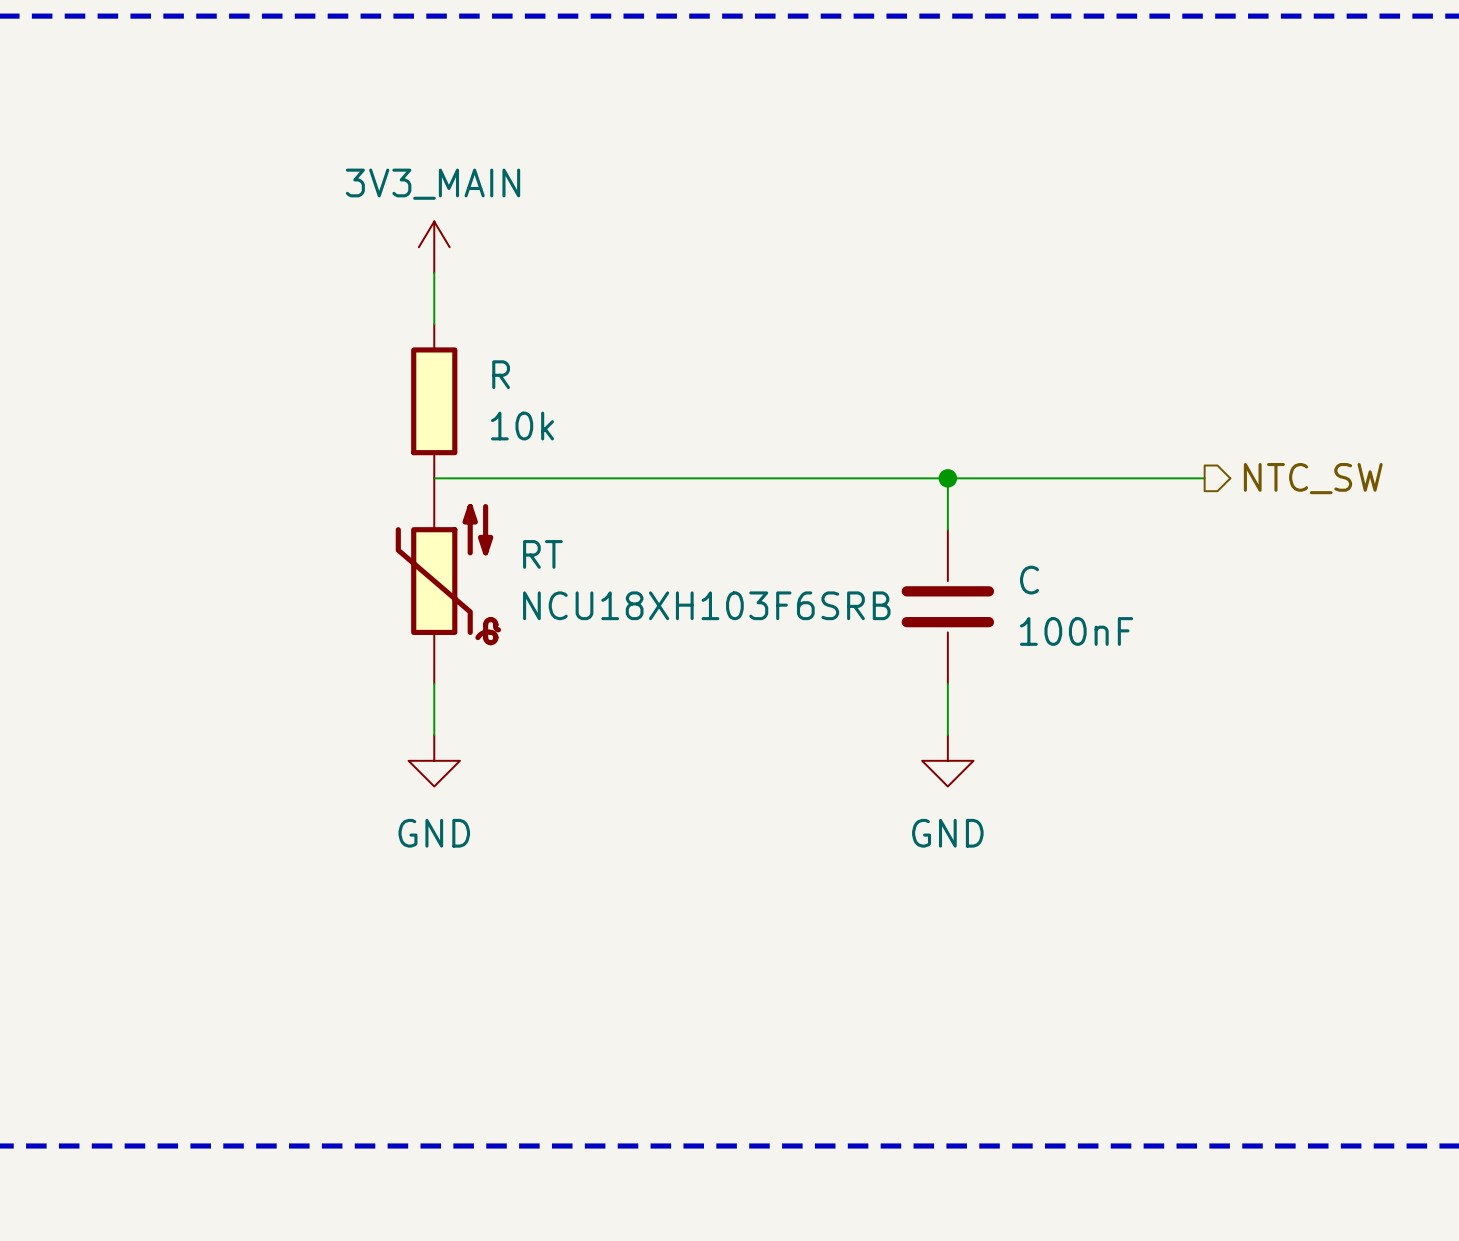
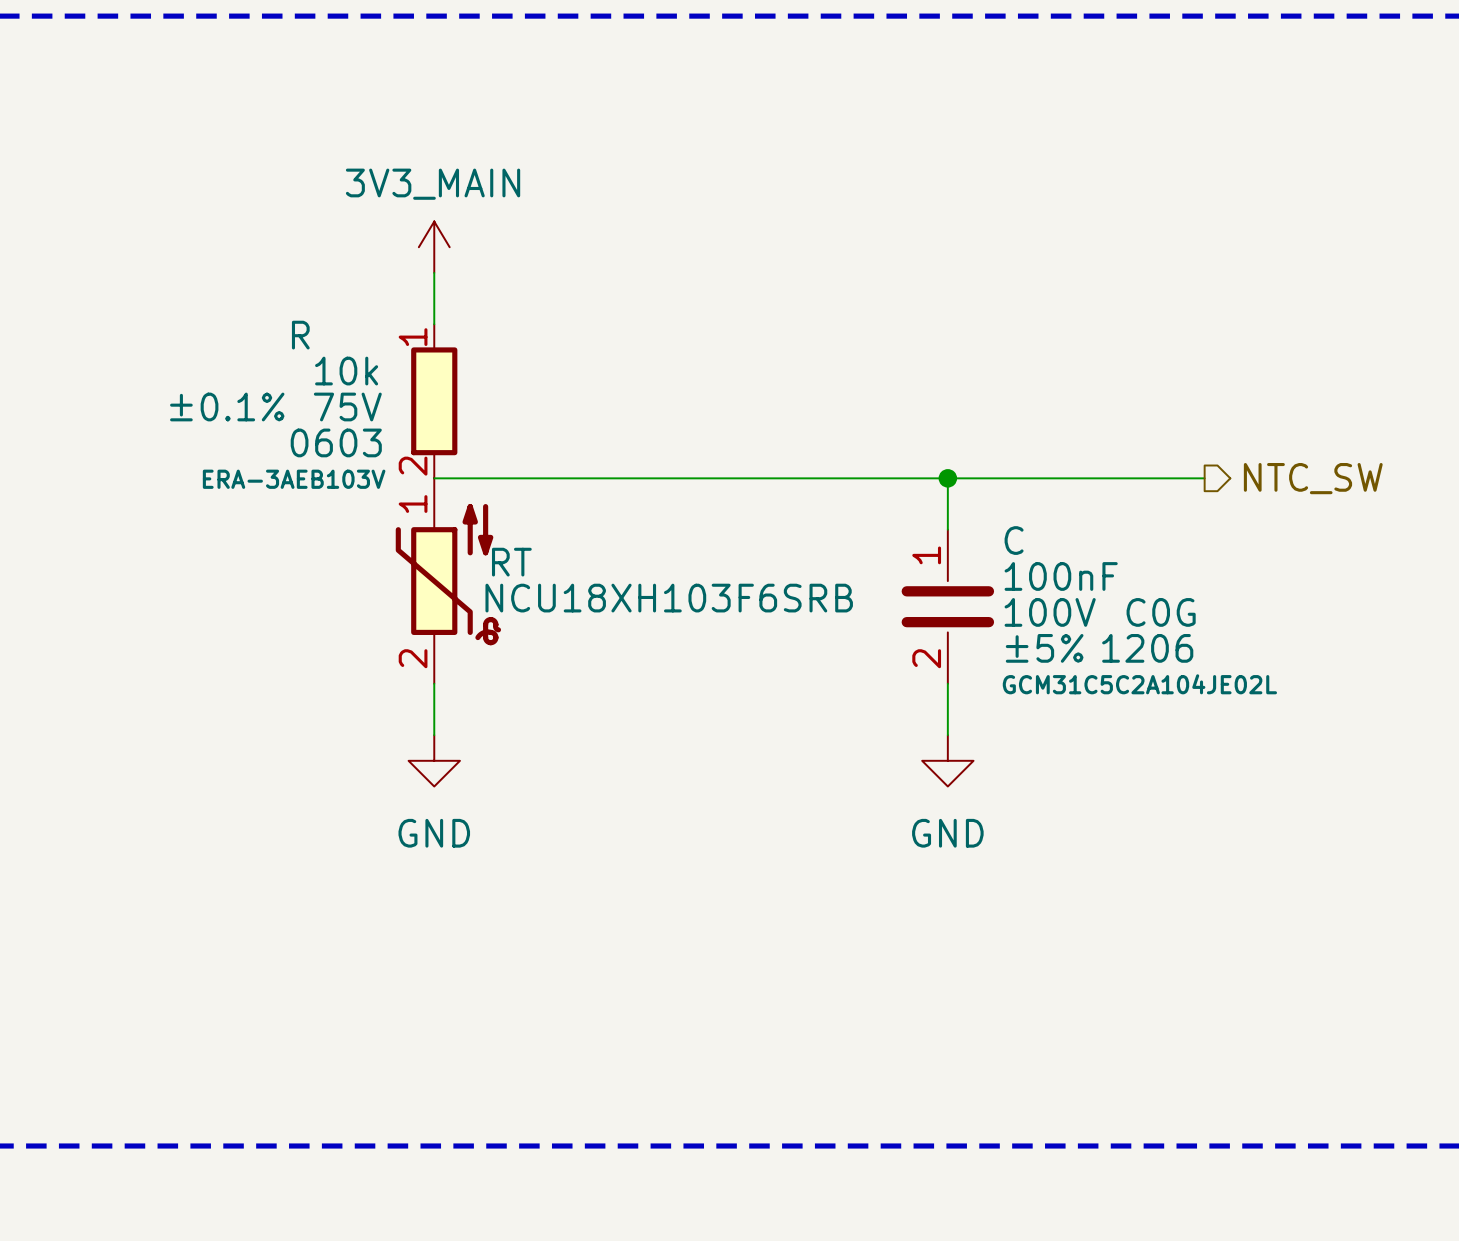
R pin number: none -> 1 (413, 337)
R name position: R (501, 374) -> R (300, 335)
R text: none -> ±0.1% (227, 406)
R text: none -> 75V (347, 406)
R value position: 10k (522, 426) -> 10k (346, 371)
R text: none -> 0603 (336, 442)
R pin number: none -> 2 (413, 466)
R text: none -> ERA-3AEB103V (294, 479)
RT pin number: none -> 1 (413, 504)
RT name position: RT (542, 554) -> RT (511, 562)
C pin number: none -> 1 (926, 555)
C name position: C (1029, 580) -> C (1014, 540)
RT value position: NCU18XH103F6SRB (706, 605) -> NCU18XH103F6SRB (669, 598)
C text: none -> 100V (1050, 612)
C text: none -> C0G (1161, 612)
C value position: 100nF (1076, 631) -> 100nF (1061, 576)
C text: none -> ±5% (1044, 648)
C text: none -> 1206 (1147, 648)
RT pin number: none -> 2 (413, 658)
C pin number: none -> 2 (926, 658)
C text: none -> GCM31C5C2A104JE02L (1139, 684)

